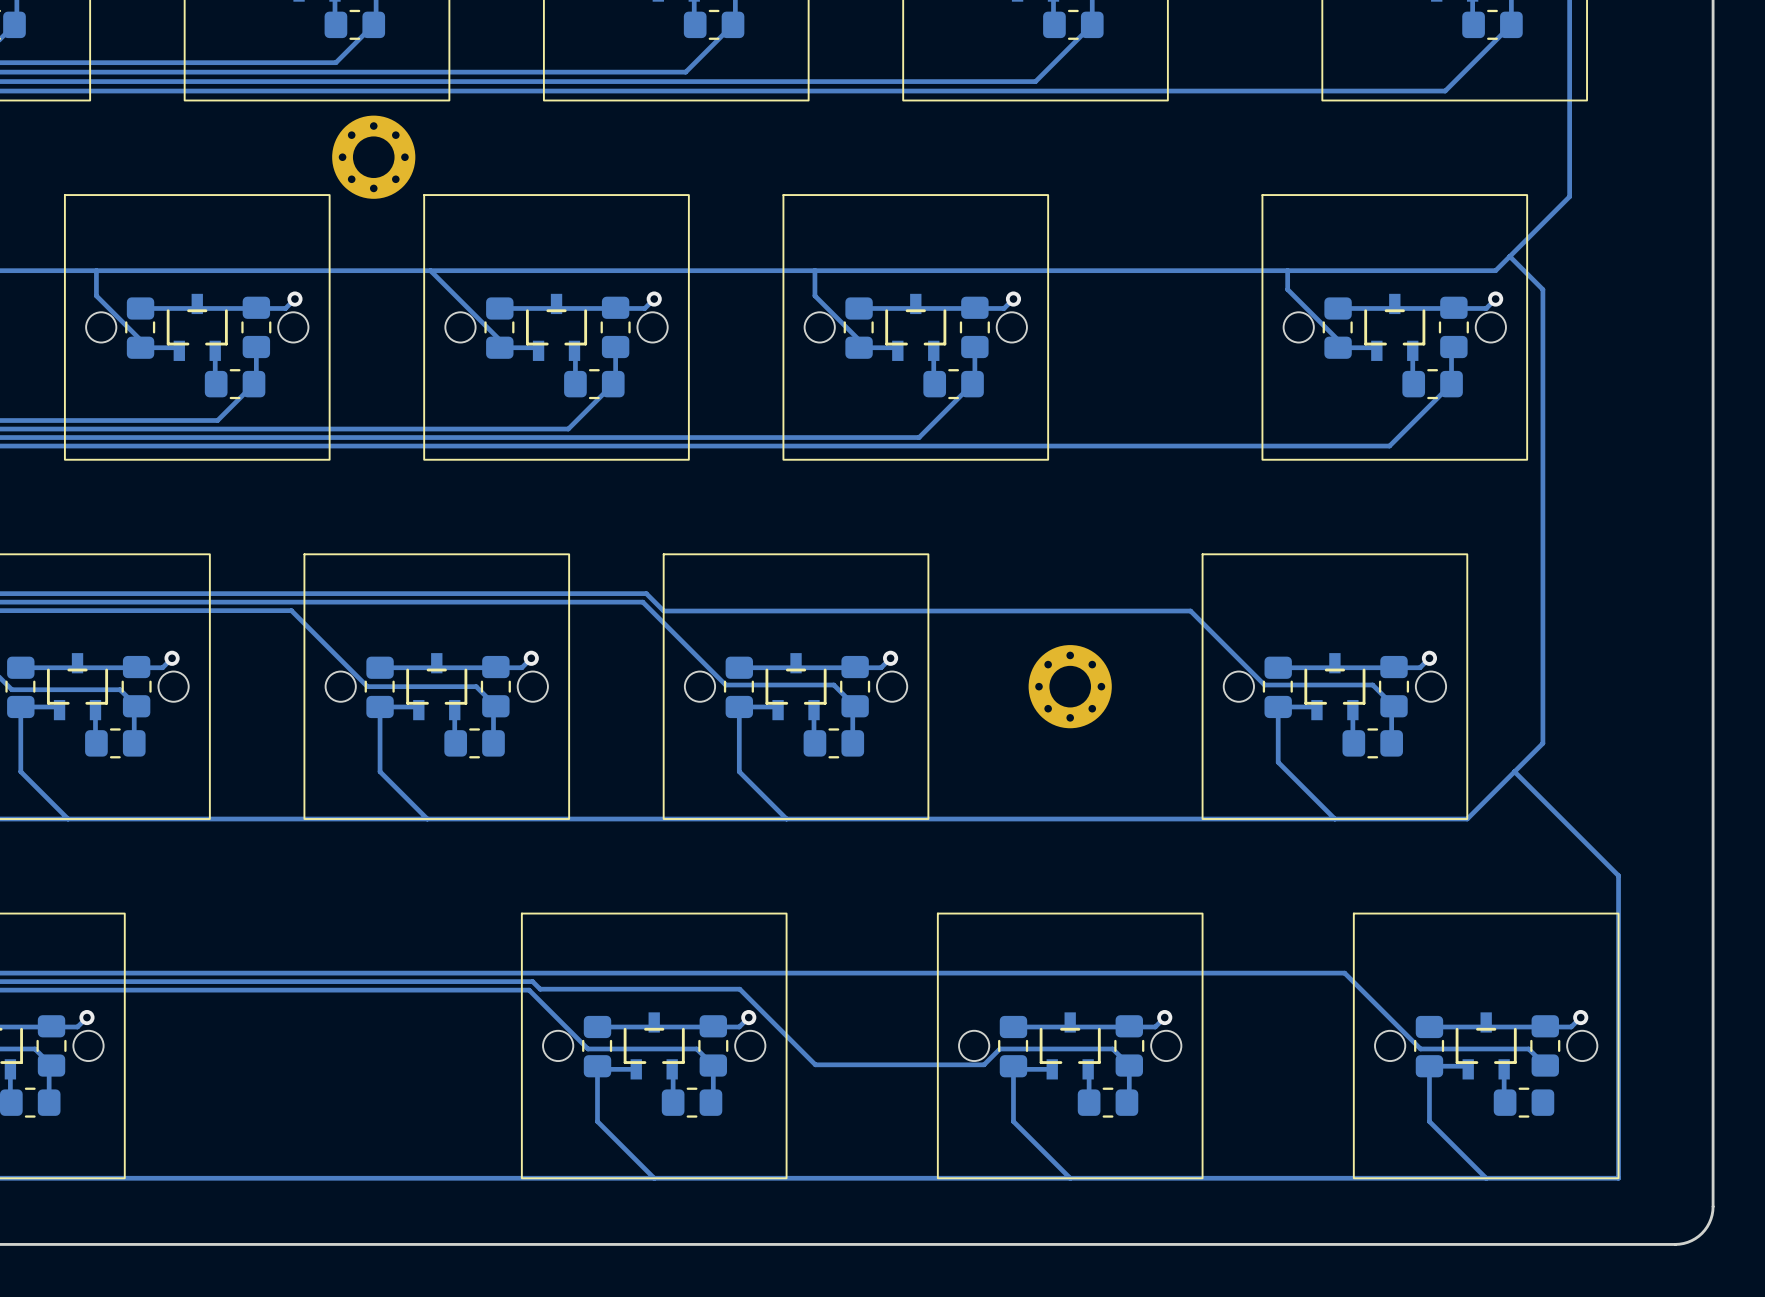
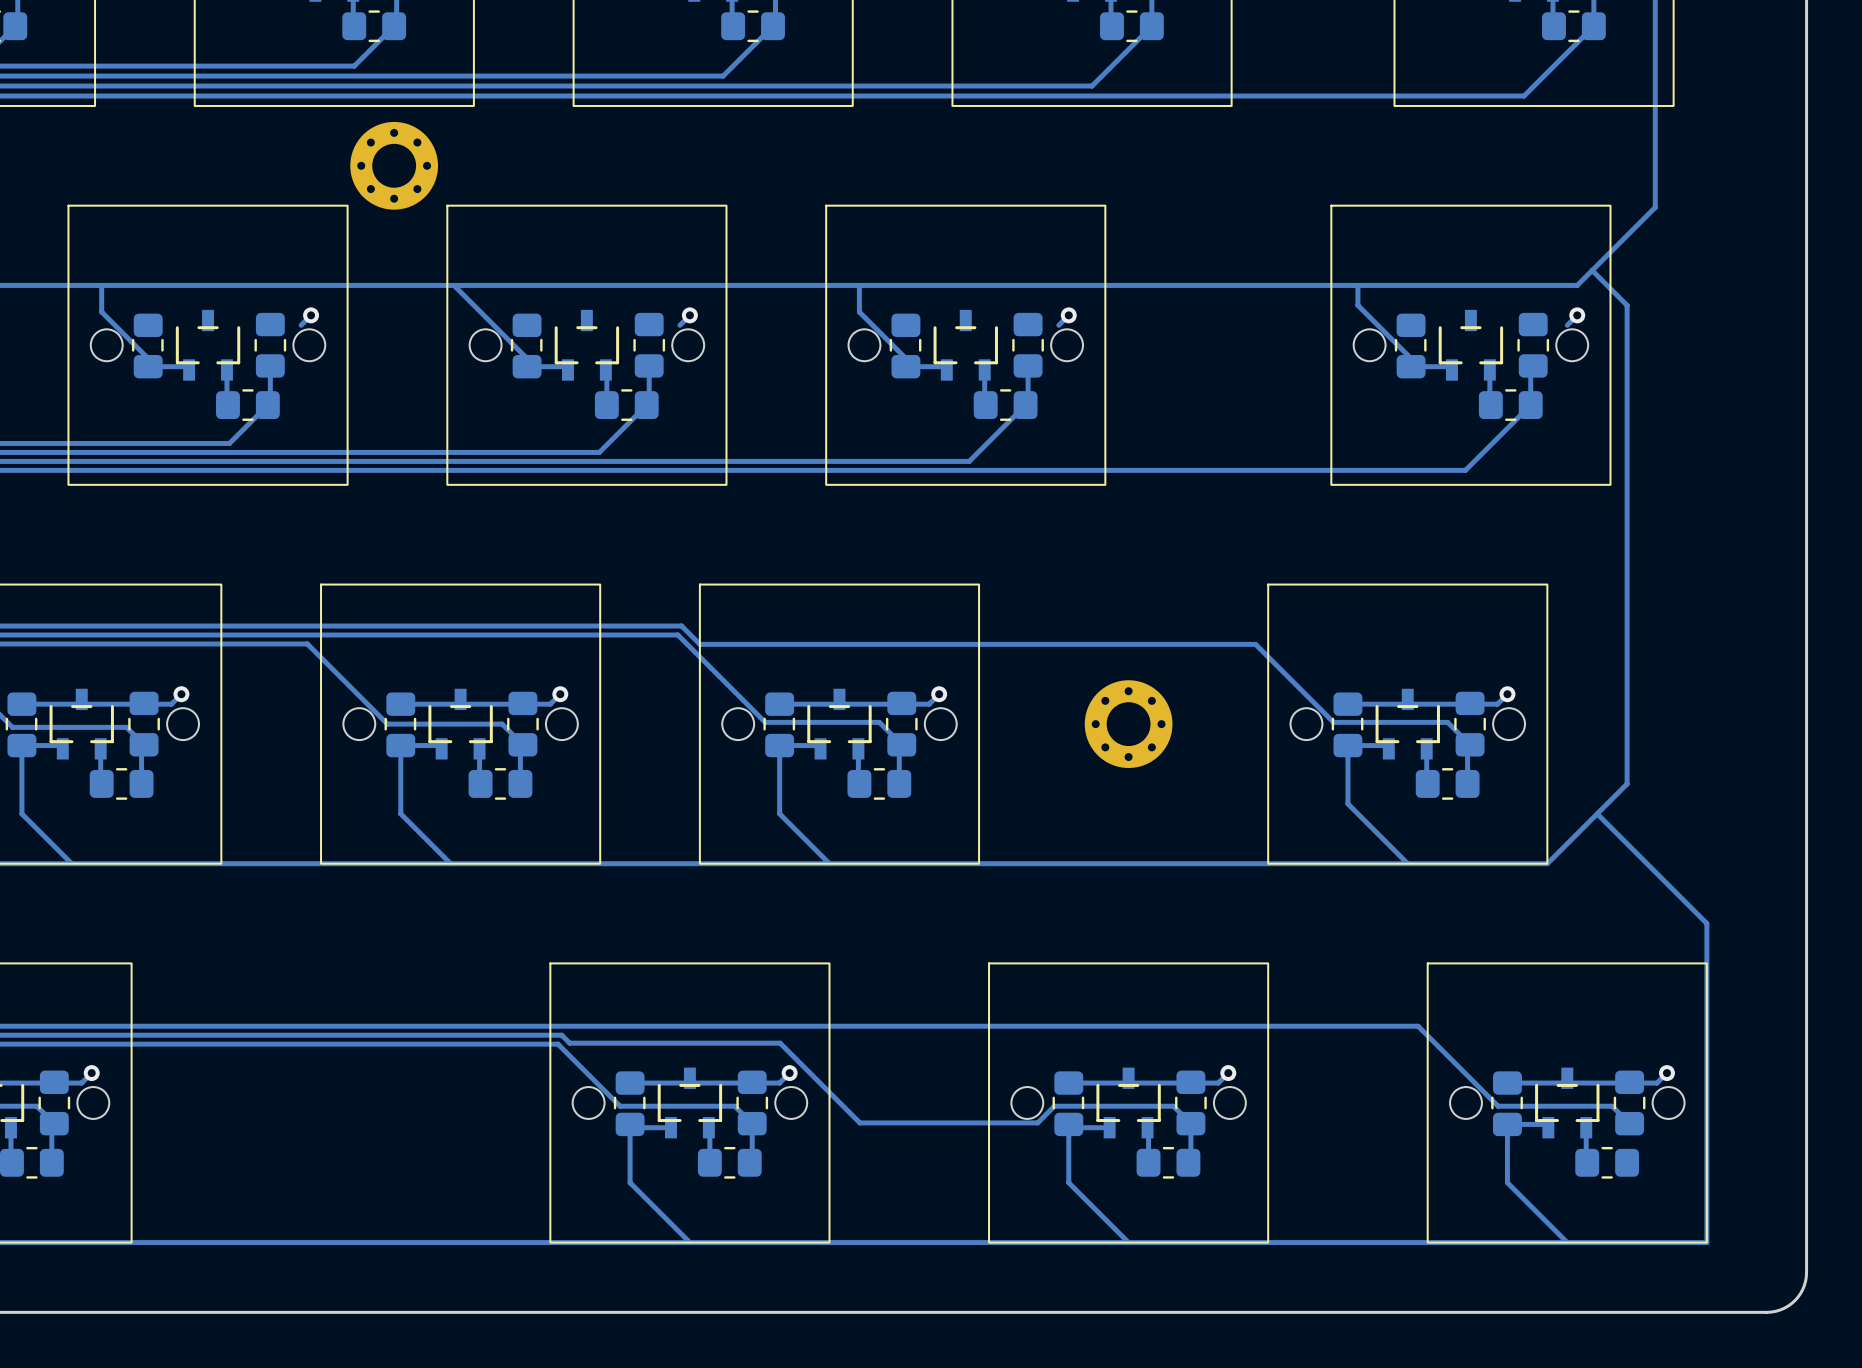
track: (285, 308) (140, 308) -> none
track: (644, 308) (499, 308) -> none
track: (1004, 308) (859, 308) -> none
track: (1486, 308) (1338, 308) -> none

